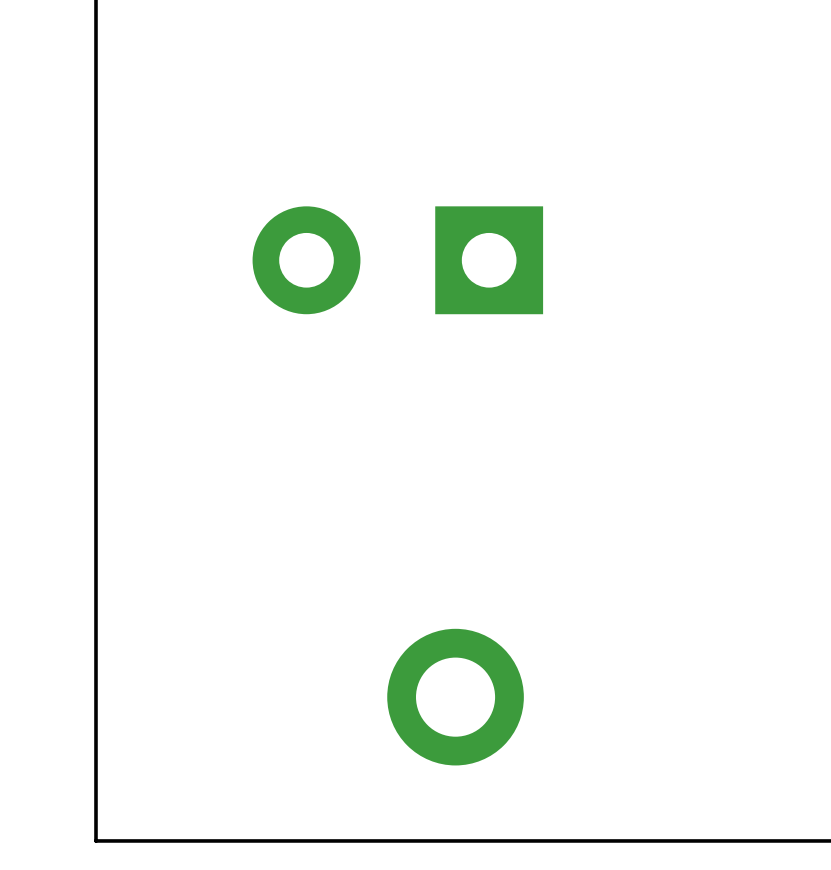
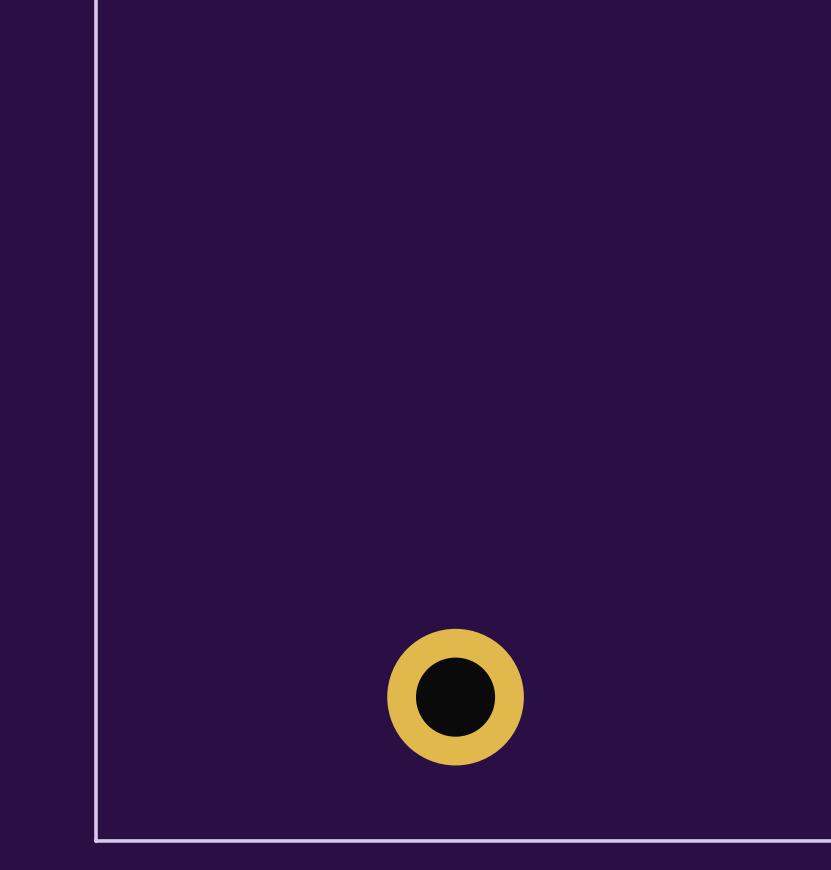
part: (397, 260) -> none

